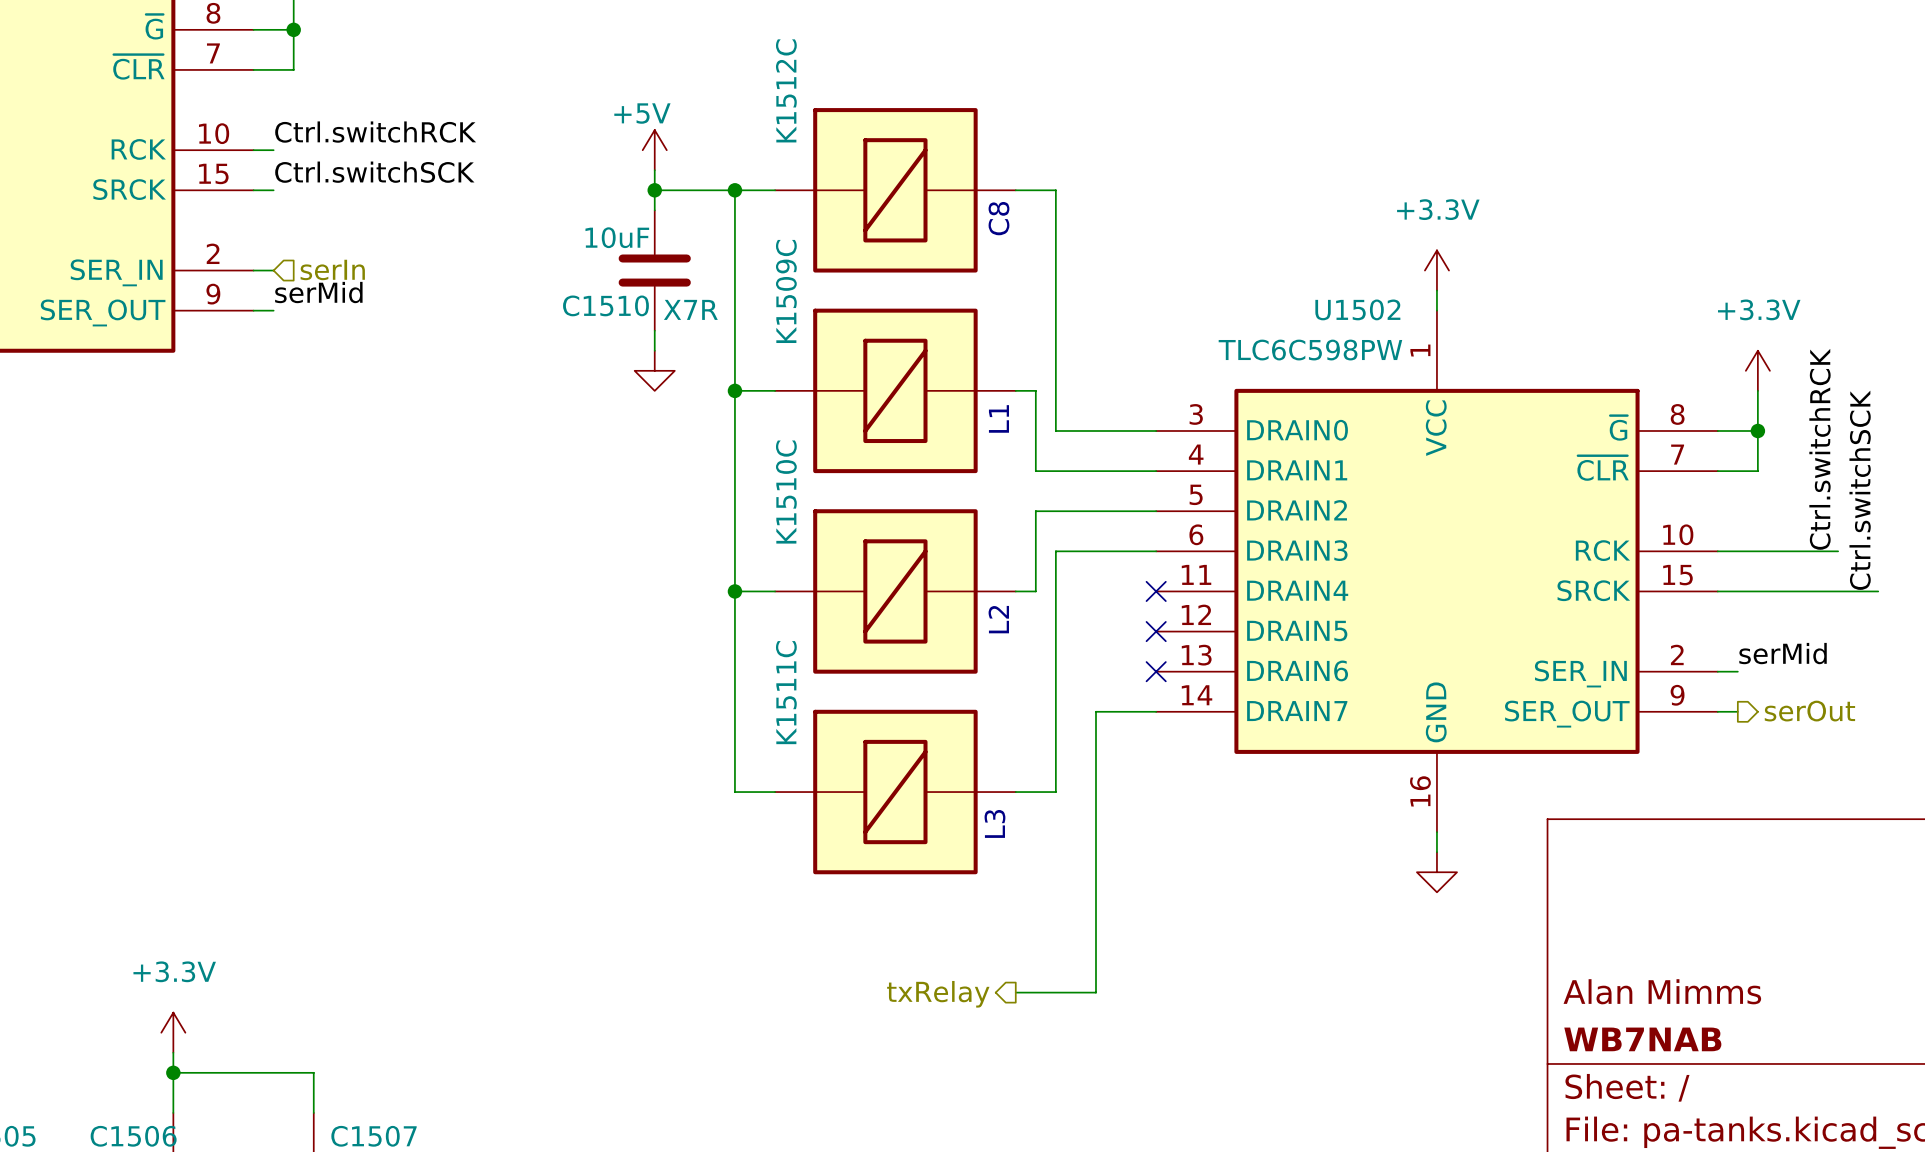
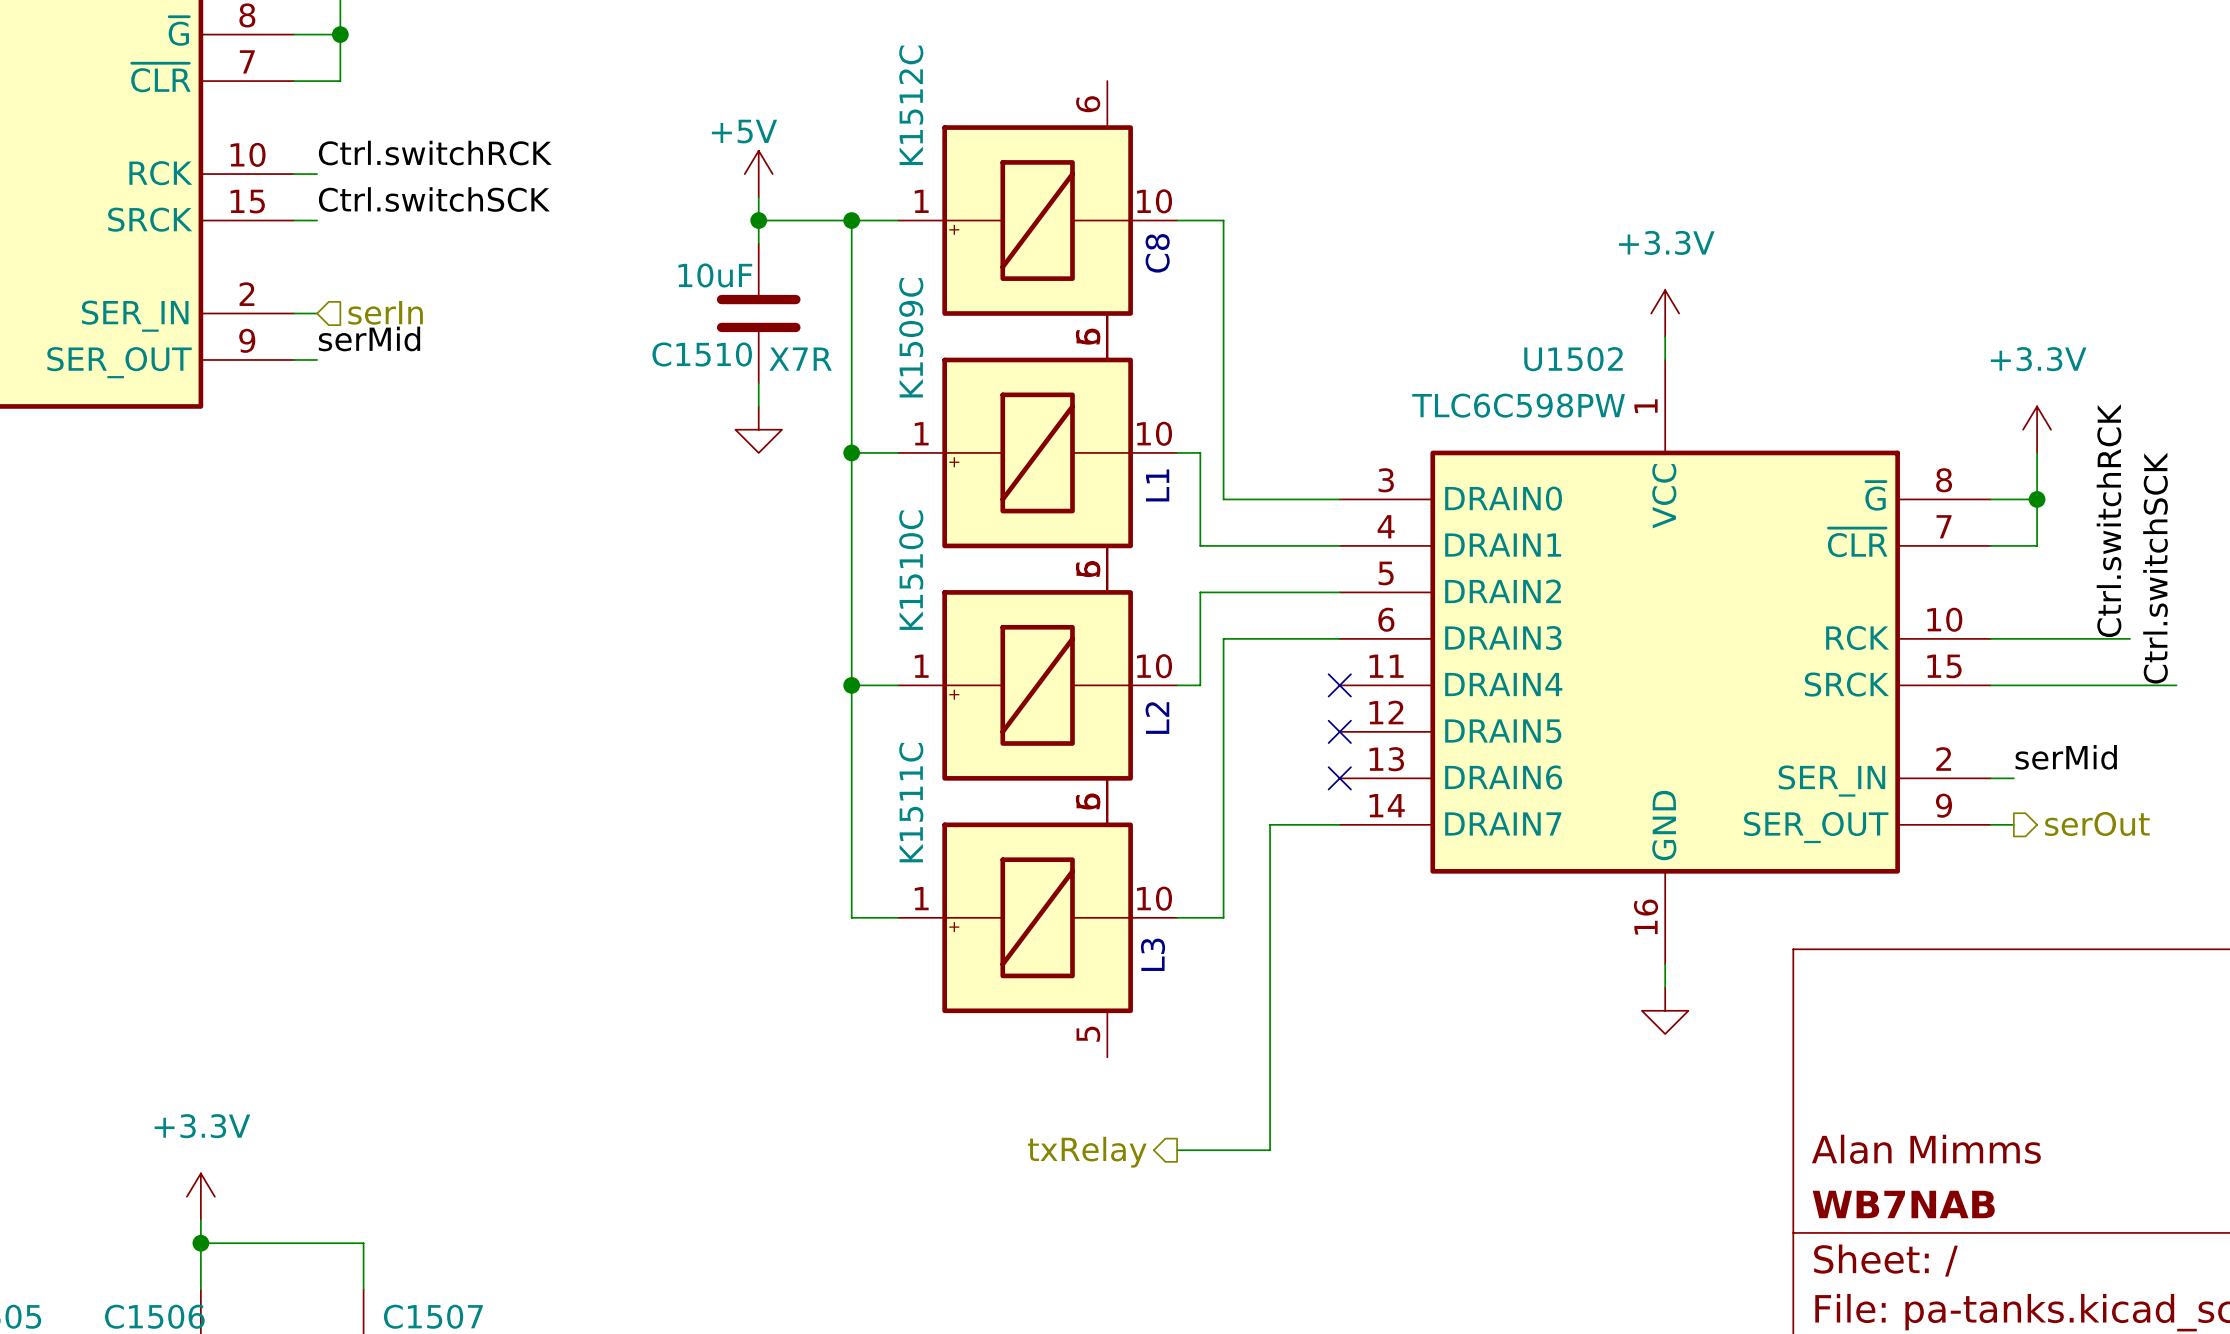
K1512C symbol: [775, 108, 1016, 273] -> [898, 81, 1178, 360]
K1509C symbol: [775, 308, 1016, 474] -> [898, 313, 1178, 593]
K1510C symbol: [775, 509, 1016, 674] -> [898, 545, 1178, 825]
K1511C symbol: [775, 709, 1016, 875] -> [898, 778, 1178, 1058]

